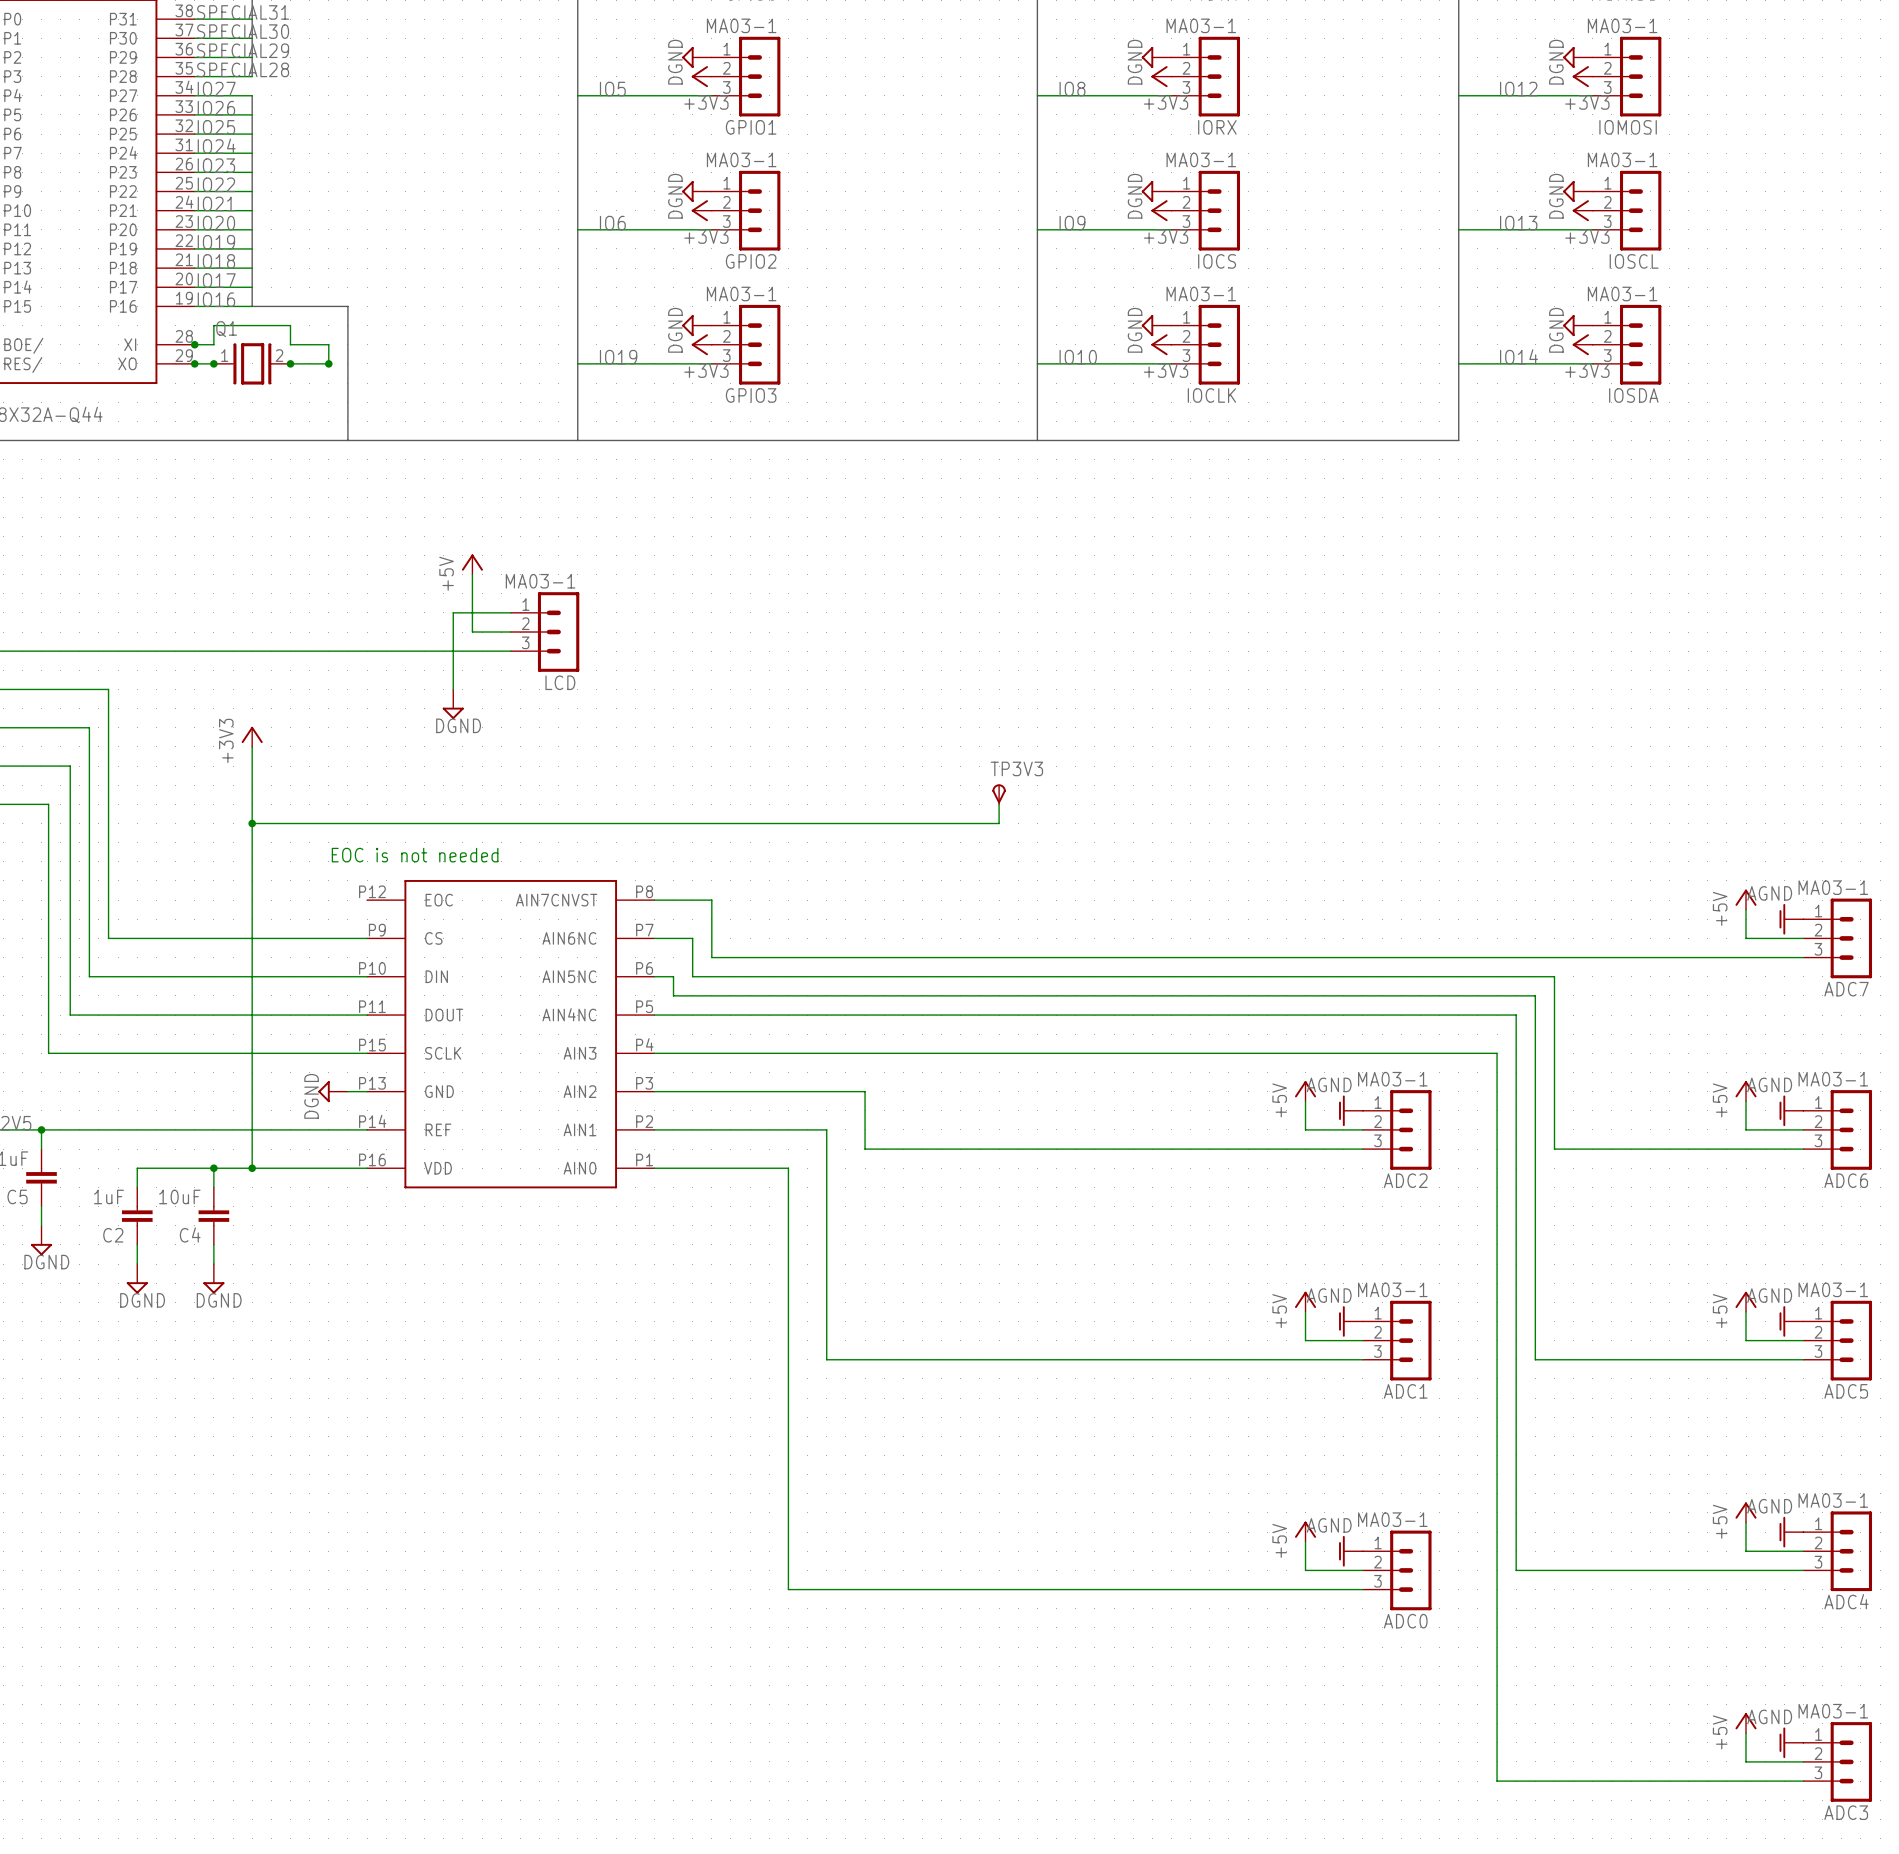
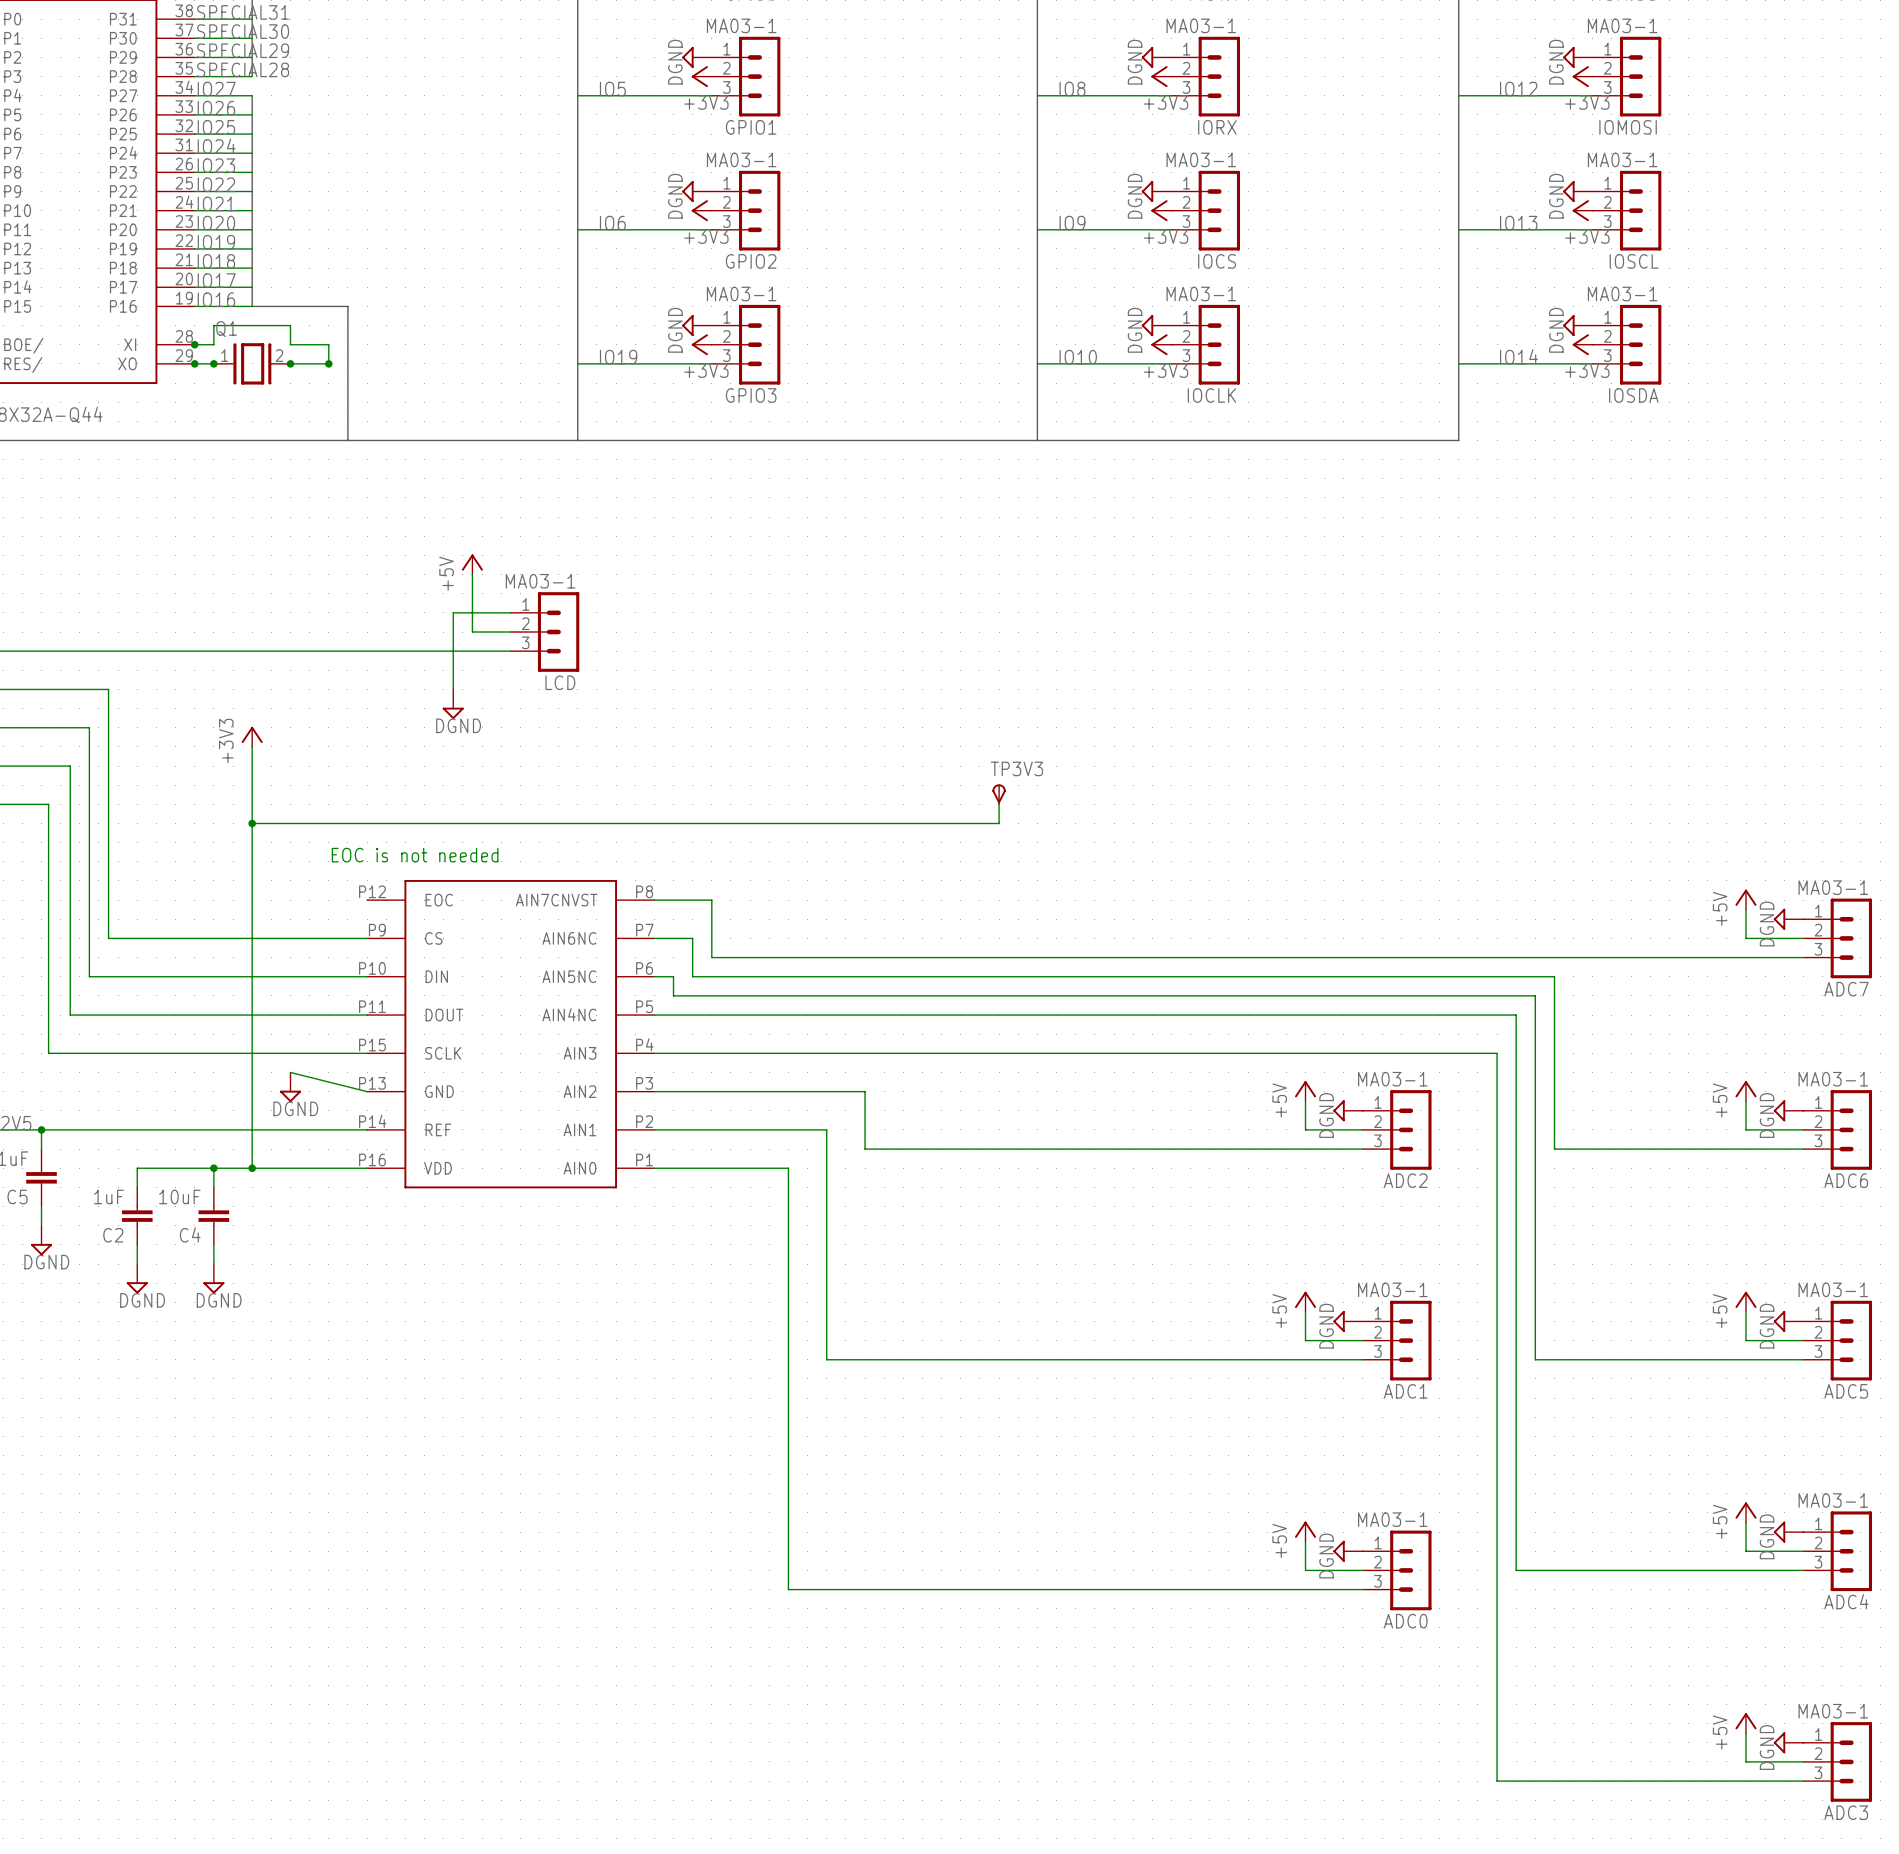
power symbol: AGND (1791, 919) -> DGND (1788, 919)
power symbol rotation: 0° (324, 1091) -> 90° counterclockwise (290, 1096)
power symbol position: DGND (333, 1091) -> DGND (290, 1087)
wire: (347, 1091) (367, 1091) -> (290, 1072) (367, 1091)
power symbol: AGND (1351, 1110) -> DGND (1348, 1110)
power symbol: AGND (1791, 1110) -> DGND (1788, 1110)
power symbol: AGND (1351, 1321) -> DGND (1348, 1321)
power symbol: AGND (1791, 1321) -> DGND (1788, 1321)
power symbol: AGND (1791, 1532) -> DGND (1788, 1532)
power symbol: AGND (1351, 1551) -> DGND (1348, 1551)
power symbol: AGND (1791, 1742) -> DGND (1788, 1742)

